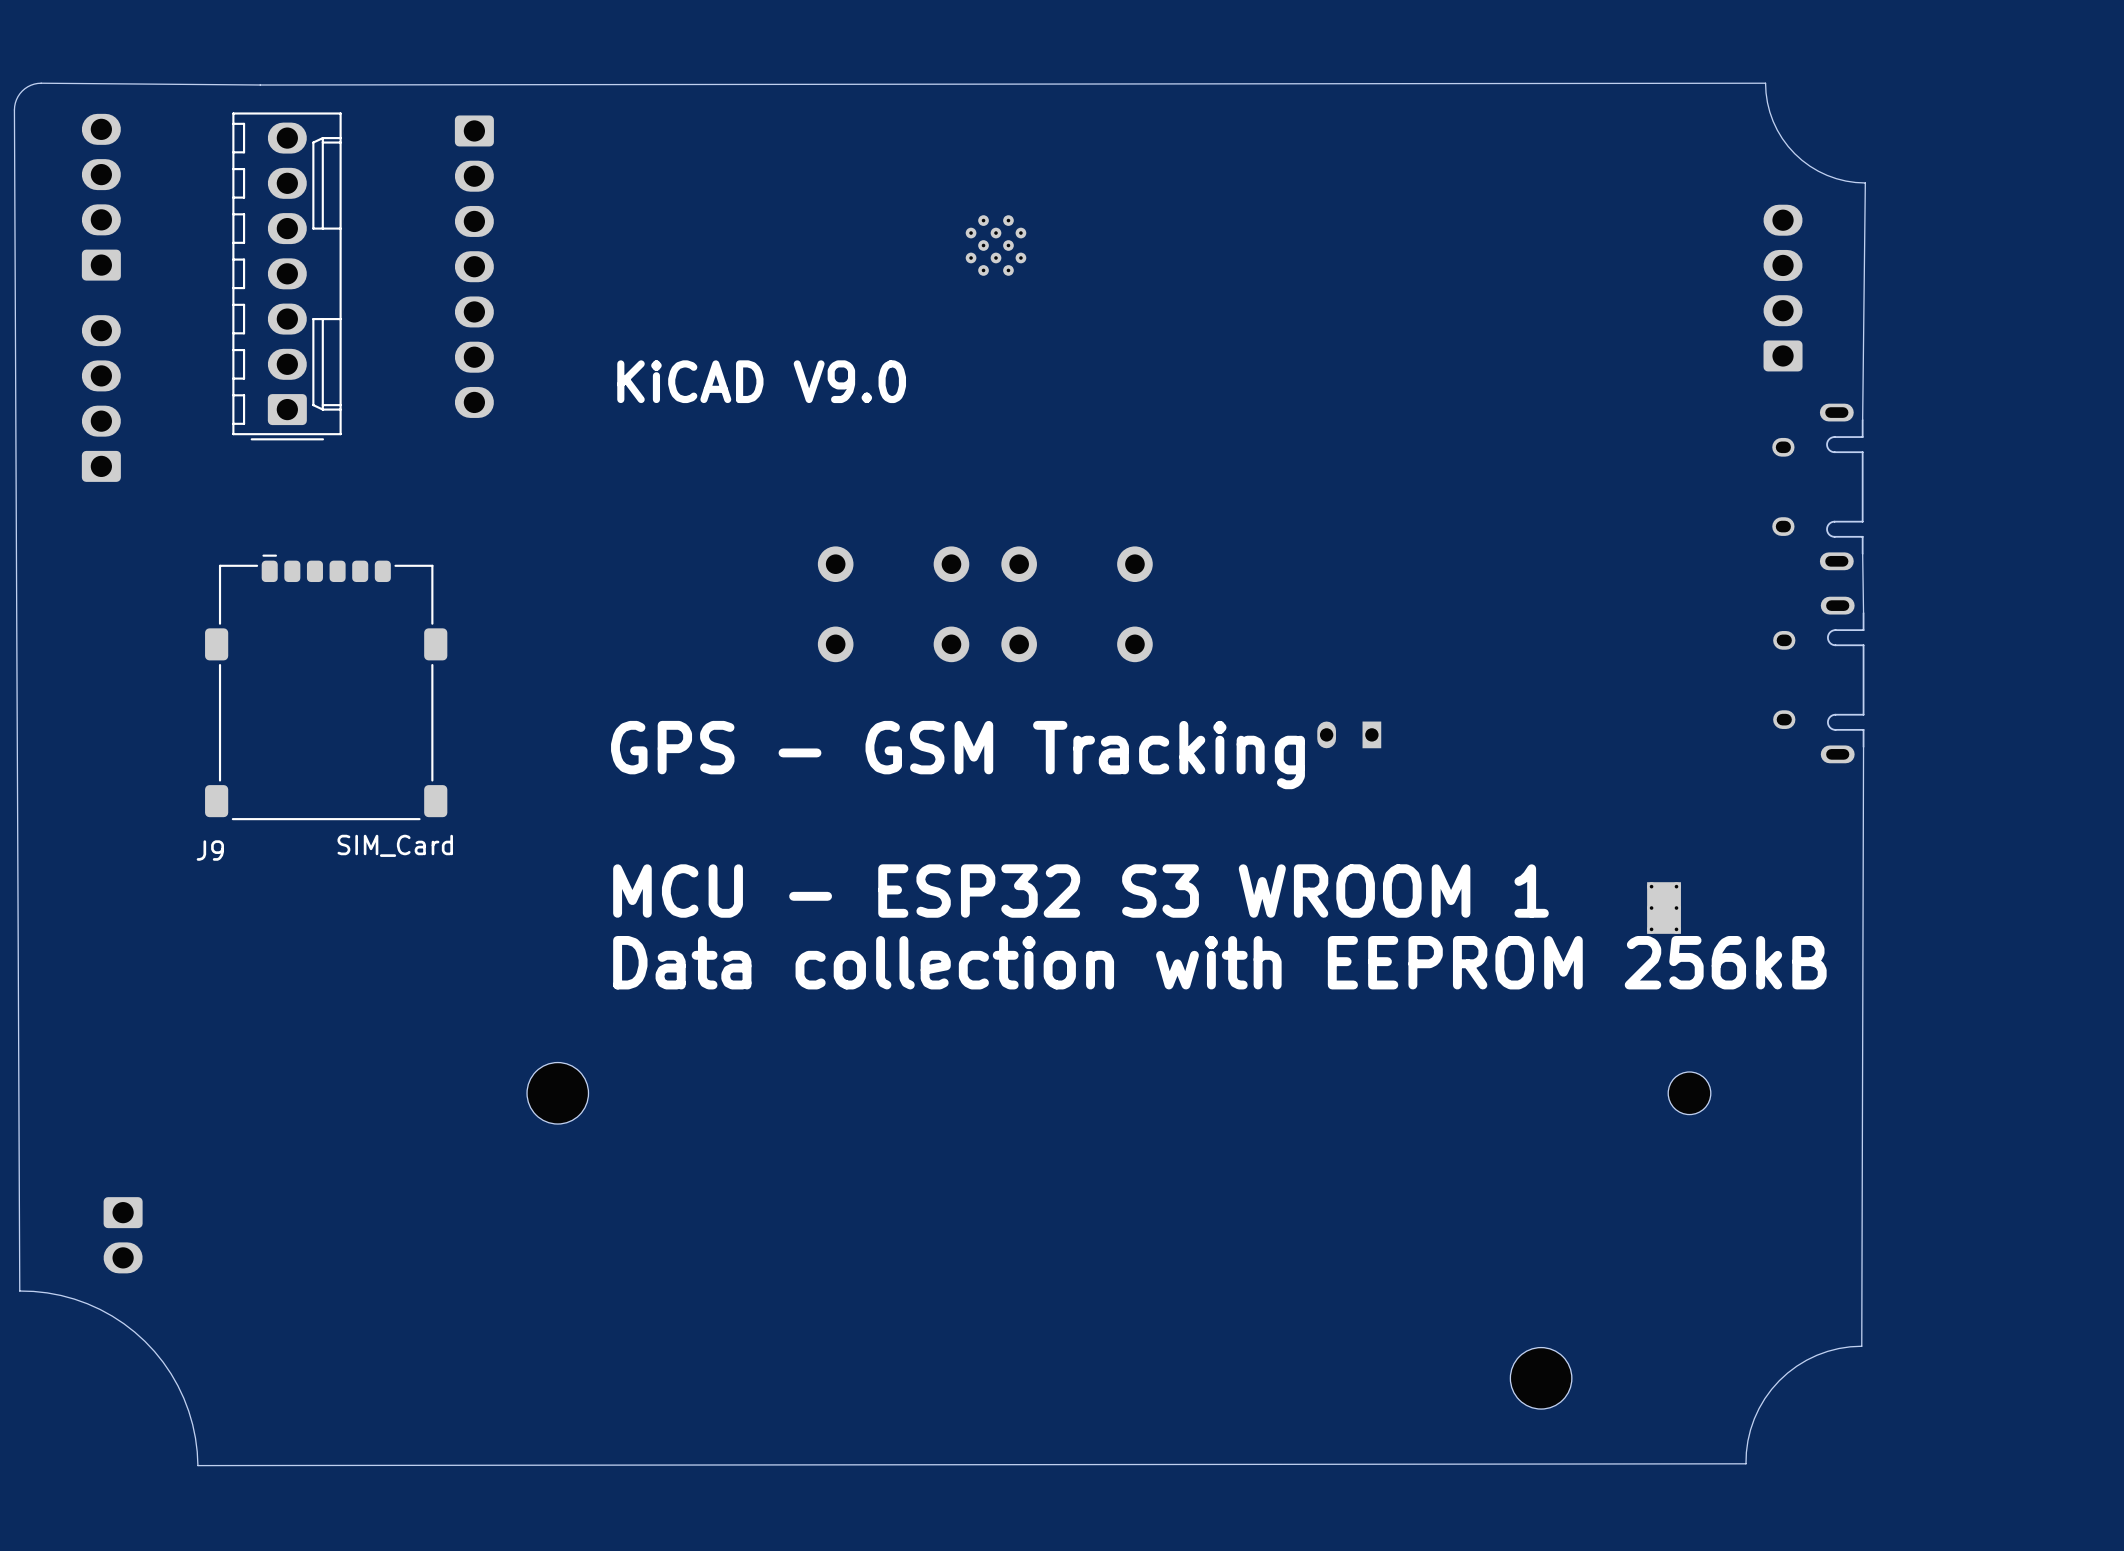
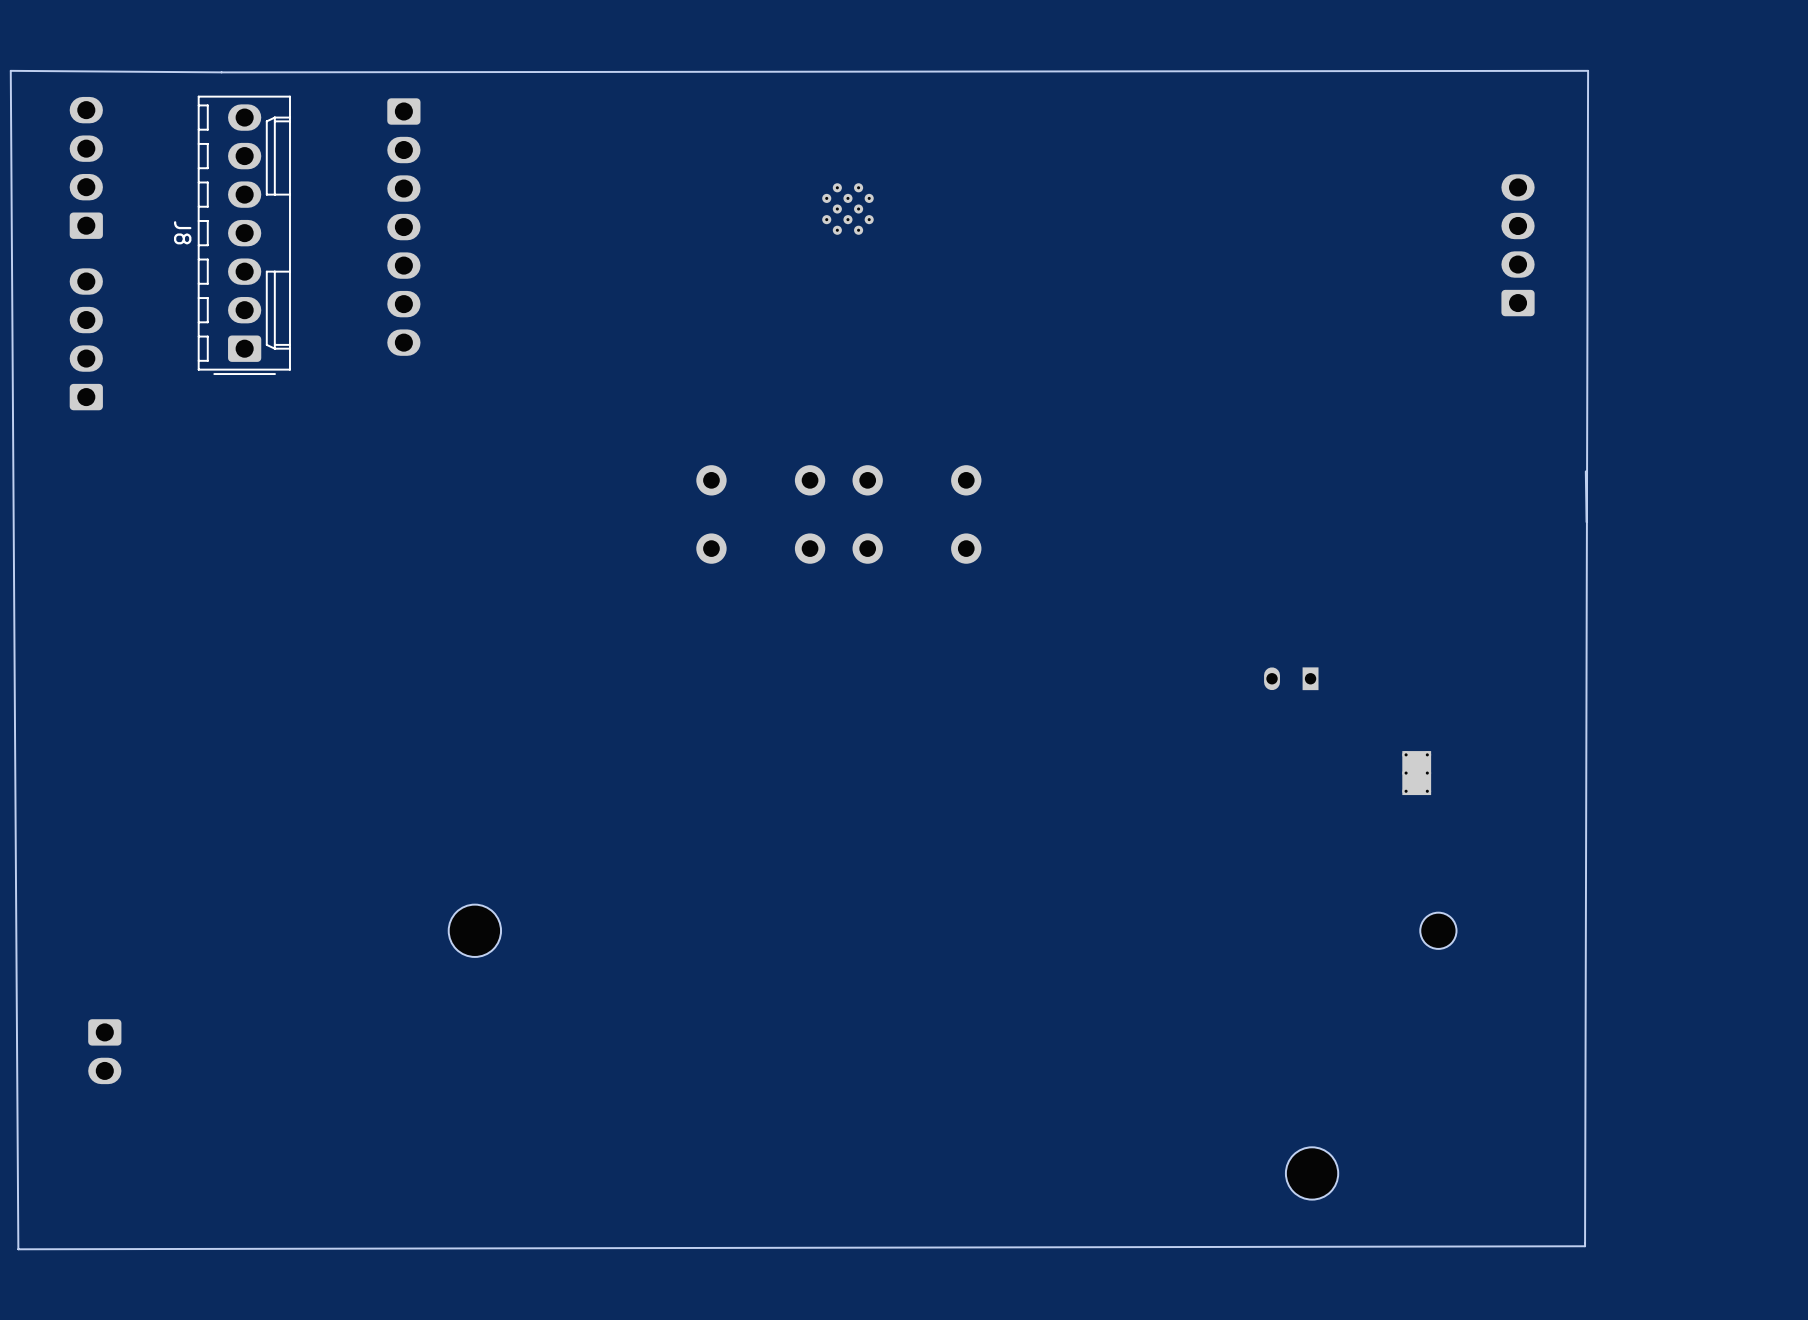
board edge: none -> (1588, 70) (221, 72) (10, 70) (18, 1249) (1585, 1246) (1588, 70)
J8 name: none -> J8 (182, 232)
text: KiCAD V9.0 (761, 381) -> none
board edge: (1862, 420) (1865, 182) (1845, 181) (1827, 175) (1809, 166) (1794, 153) (1782, 138) (1773, 121) (1767, 102) (1765, 83) (260, 85) (41, 83) (30, 85) (19, 93) (14, 109) (19, 1291) (60, 1295) (87, 1303) (123, 1323) (145, 1341) (171, 1373) (183, 1398) (192, 1424) (197, 1465) (1745, 1463) (1747, 1440) (1754, 1418) (1764, 1398) (1779, 1380) (1796, 1366) (1817, 1355) (1838, 1348) (1861, 1346) (1863, 746) -> none
part: (1817, 486) -> none
part: (1818, 679) -> none
J9: SIM_Card (326, 687) -> none
part position: (1349, 734) -> (1291, 678)
text: GPS - GSM Tracking (957, 755) -> none
text: MCU - ESP32 S3 WROOM 1 (1080, 891) -> none
text: Data collection with EEPROM 256kB (1219, 962) -> none

